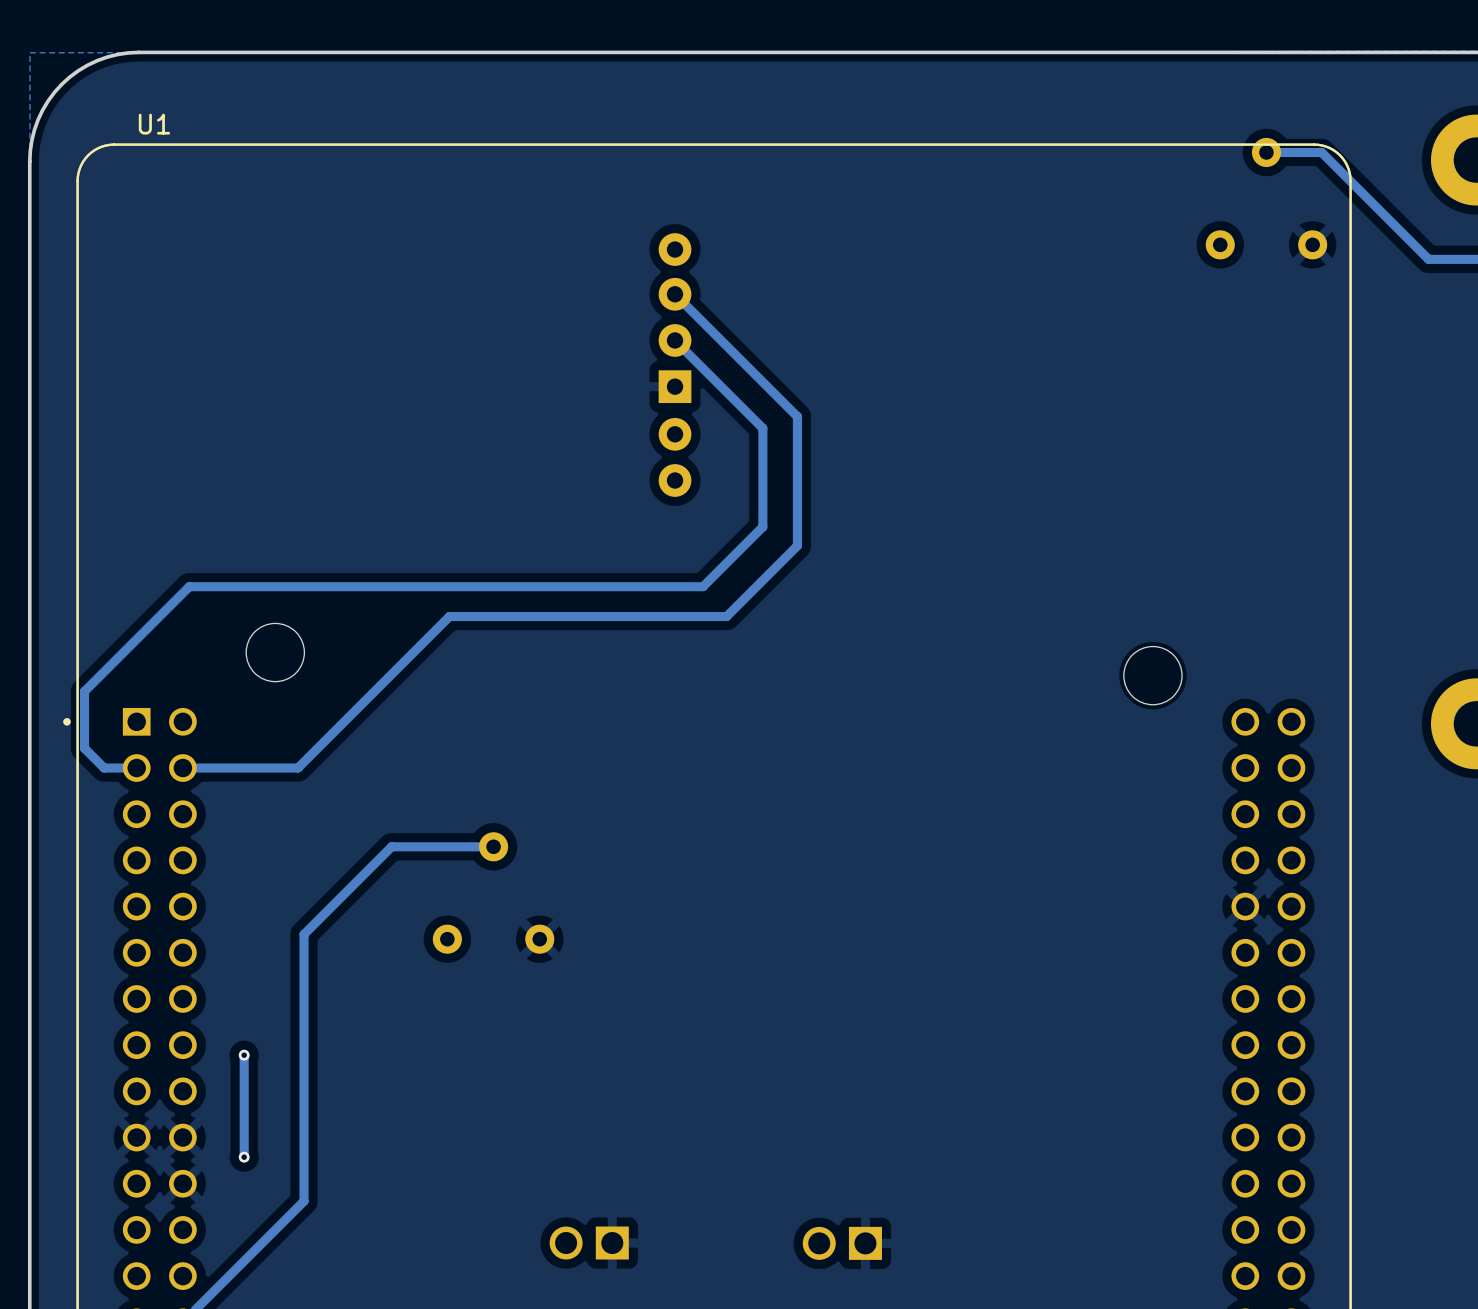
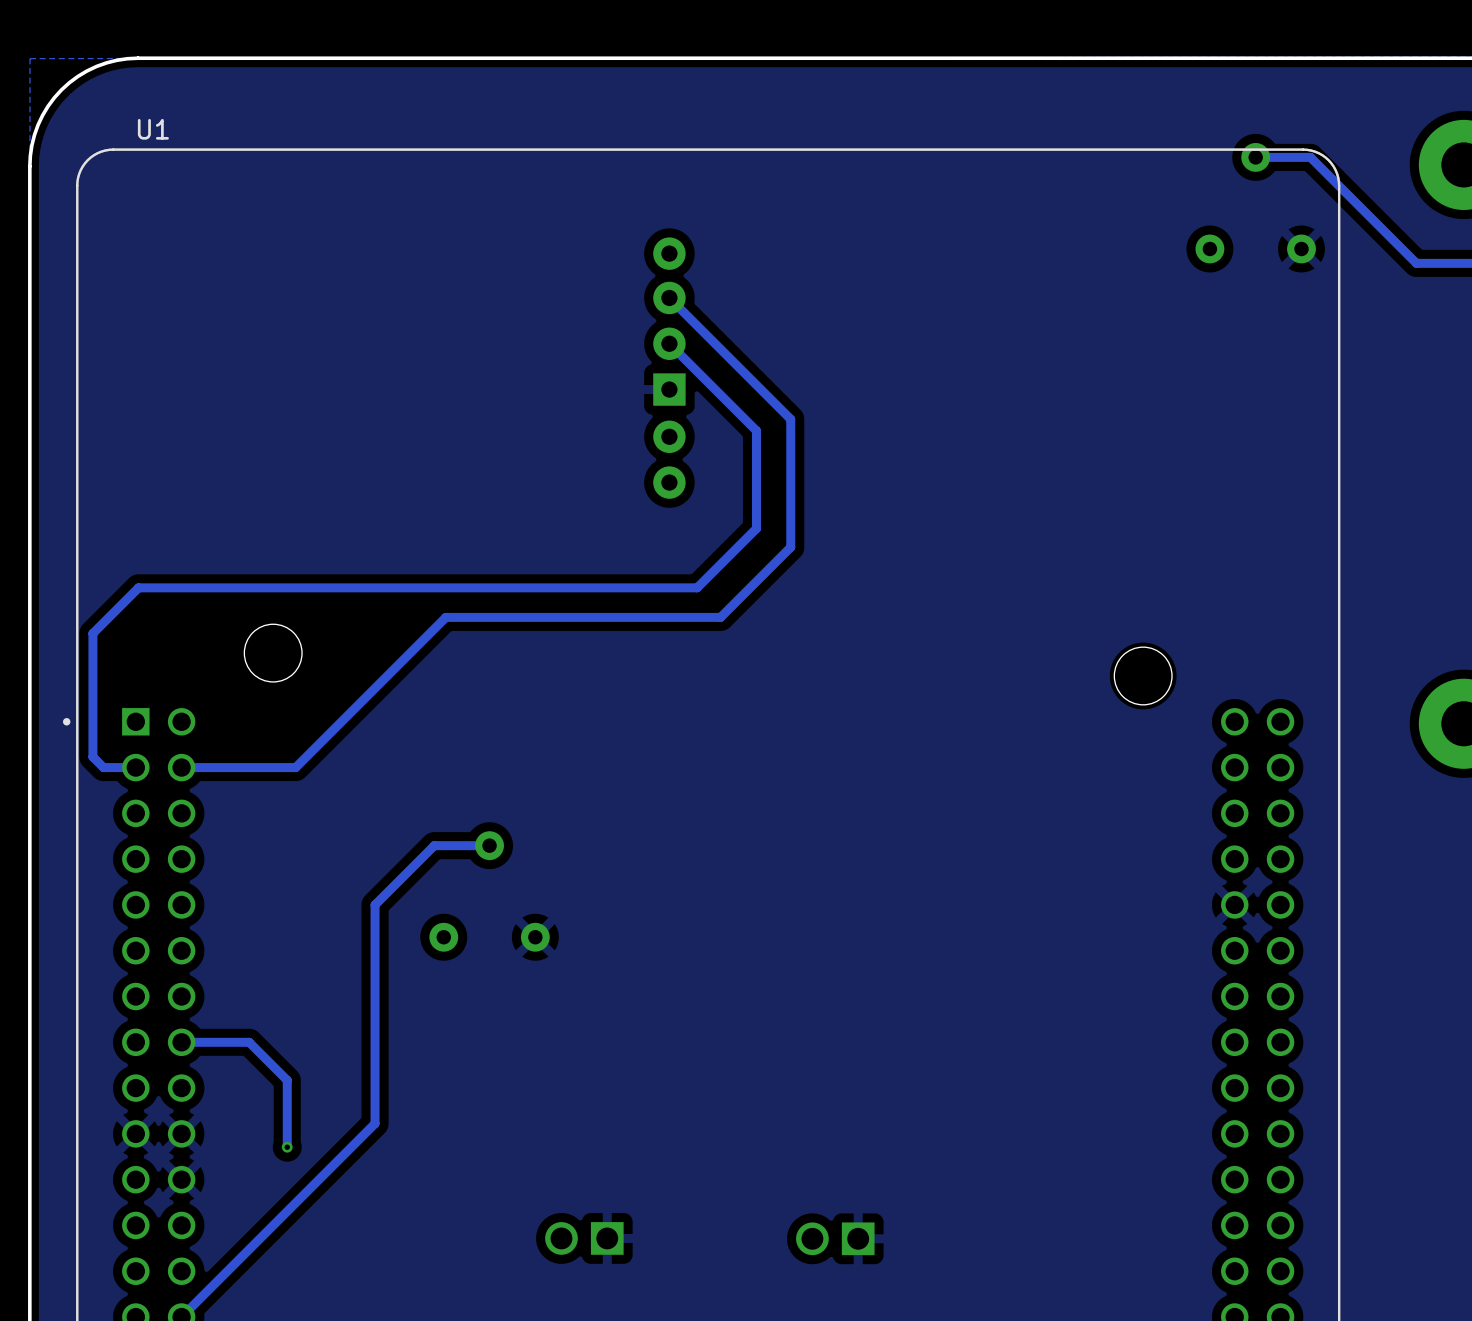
track: (189, 586) (84, 691) (84, 748) (93, 757) -> (187, 587) (138, 587) (92, 633) (92, 756)
track: (437, 846) (391, 846) (304, 934) (304, 1201) -> (434, 845) (375, 904) (375, 1123) (301, 1196)
track: none -> (181, 1042) (249, 1042) (287, 1080) (287, 1147)
track: (244, 1055) (244, 1157) -> none
via: (244, 1055) -> none
via position: (244, 1157) -> (287, 1147)

